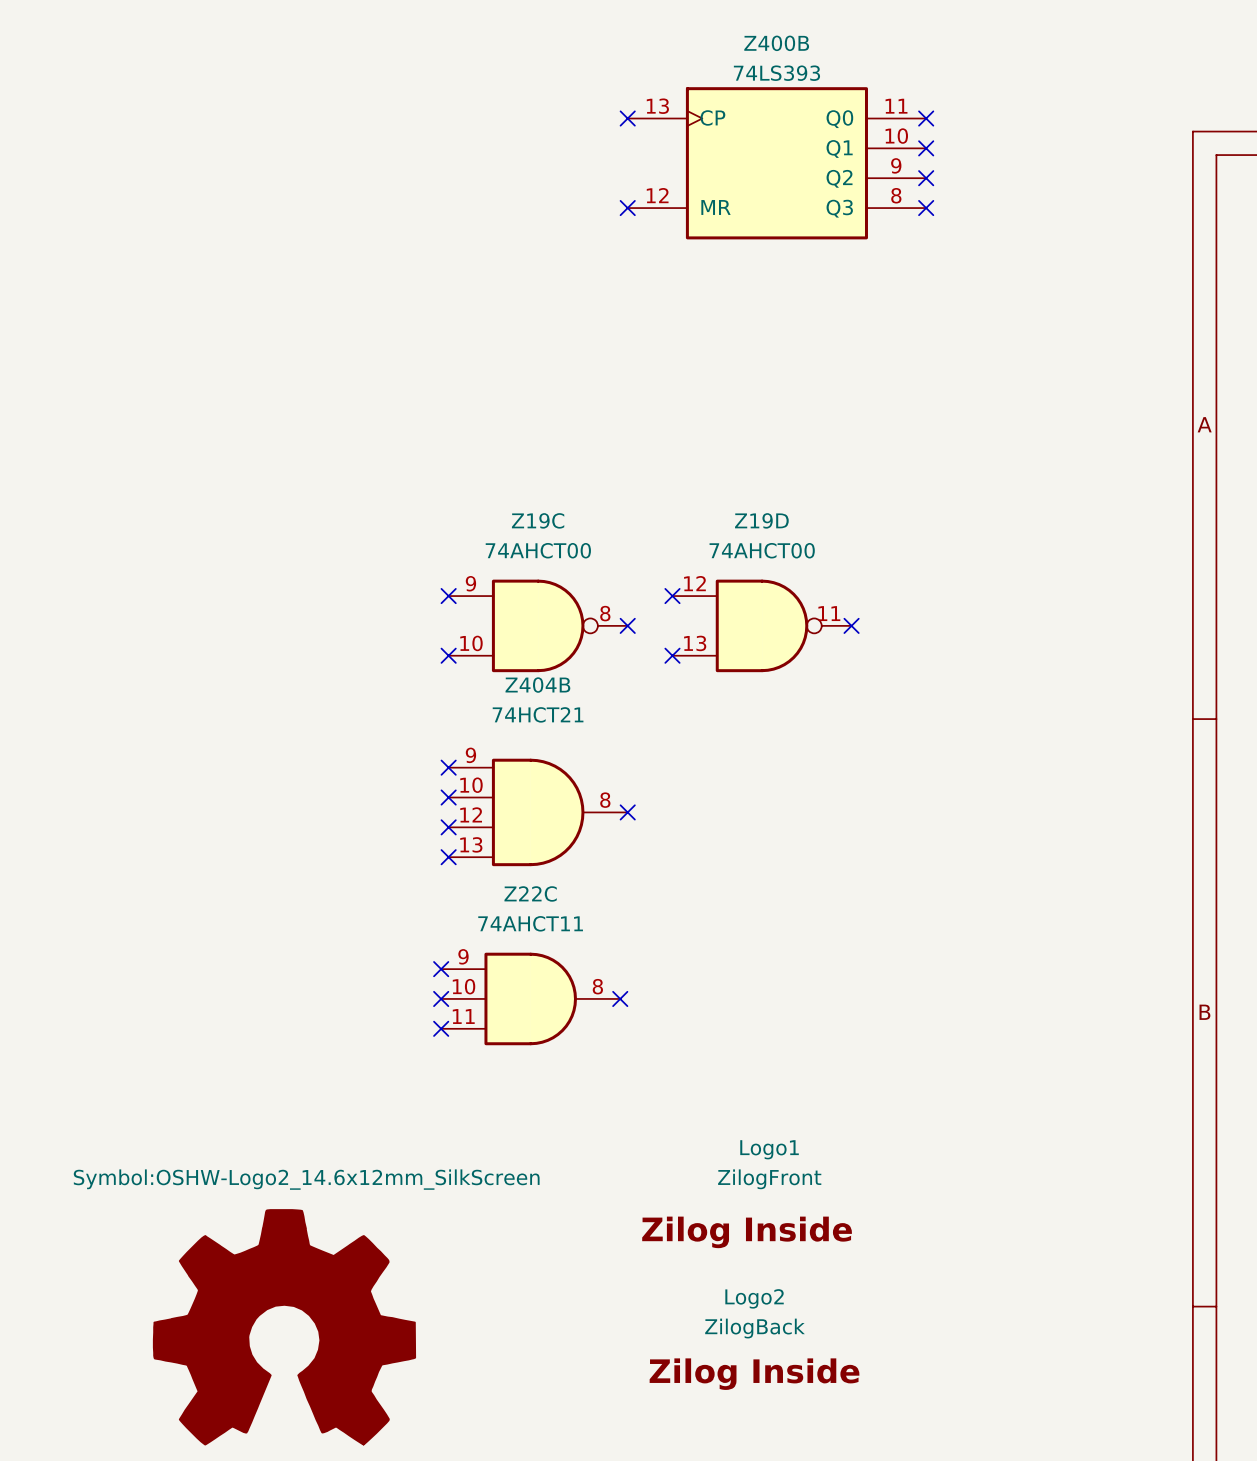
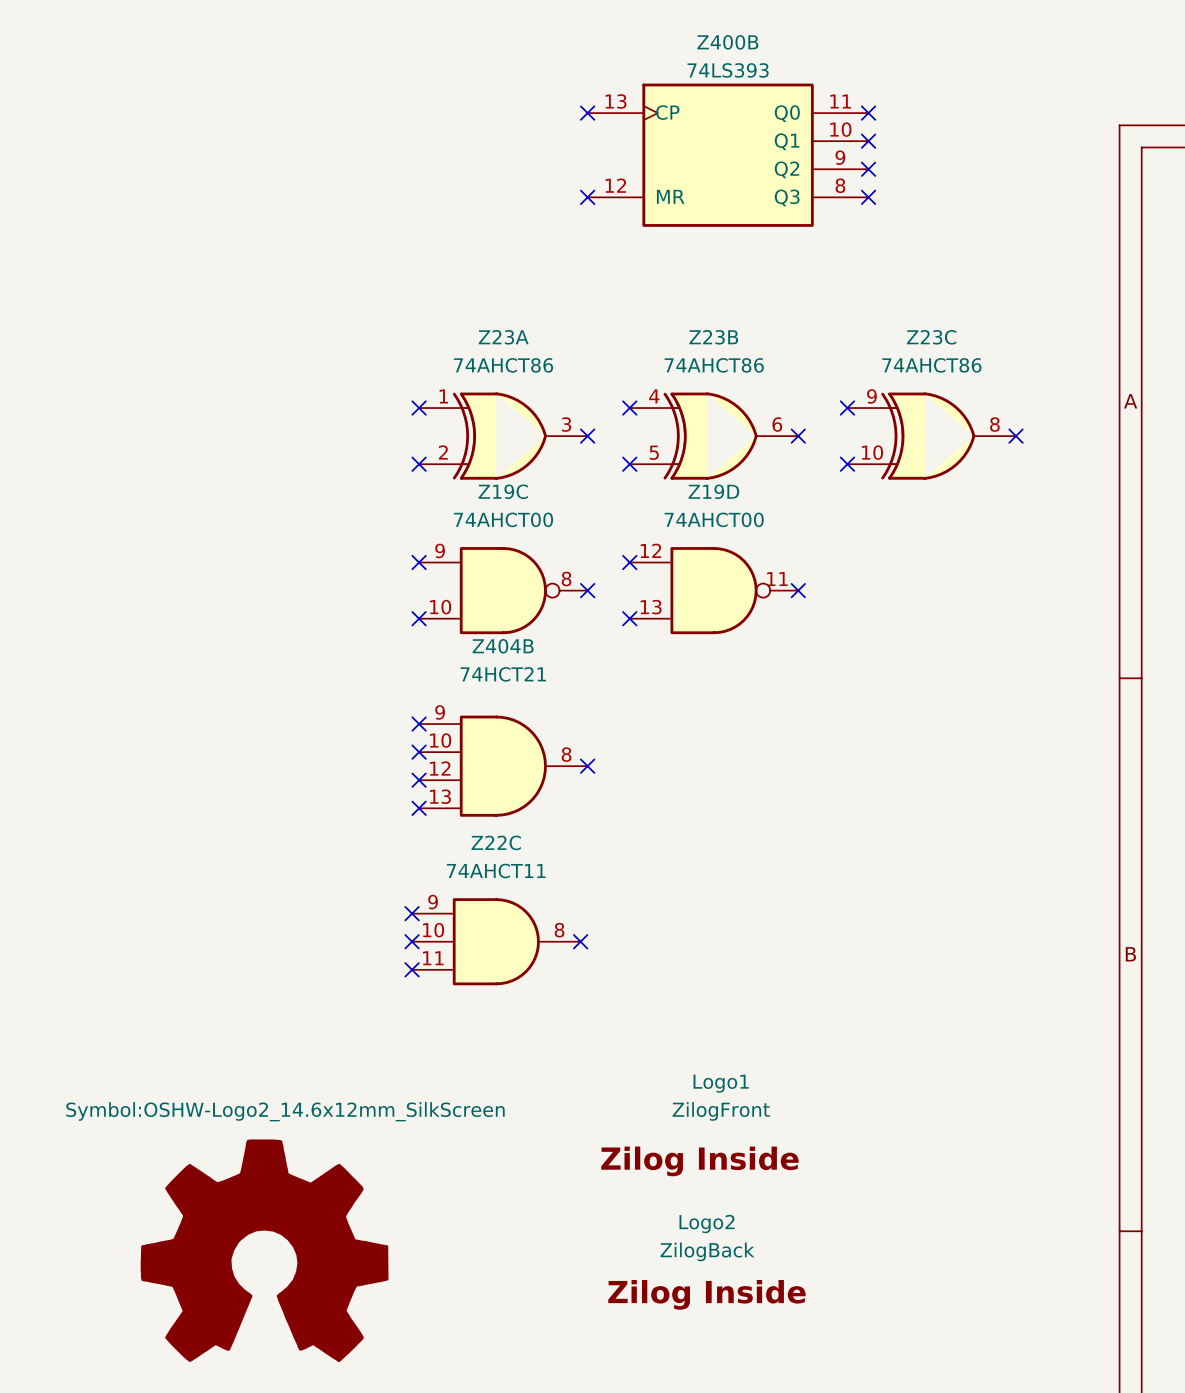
no-connect mark: none -> (419, 408)
no-connect mark: none -> (629, 408)
no-connect mark: none -> (847, 408)
Z23A: none -> 74AHCT86 (503, 436)
no-connect mark: none -> (587, 436)
Z23B: none -> 74AHCT86 (714, 436)
no-connect mark: none -> (798, 436)
Z23C: none -> 74AHCT86 (931, 436)
no-connect mark: none -> (1016, 436)
no-connect mark: none -> (419, 464)
no-connect mark: none -> (629, 464)
no-connect mark: none -> (847, 464)

